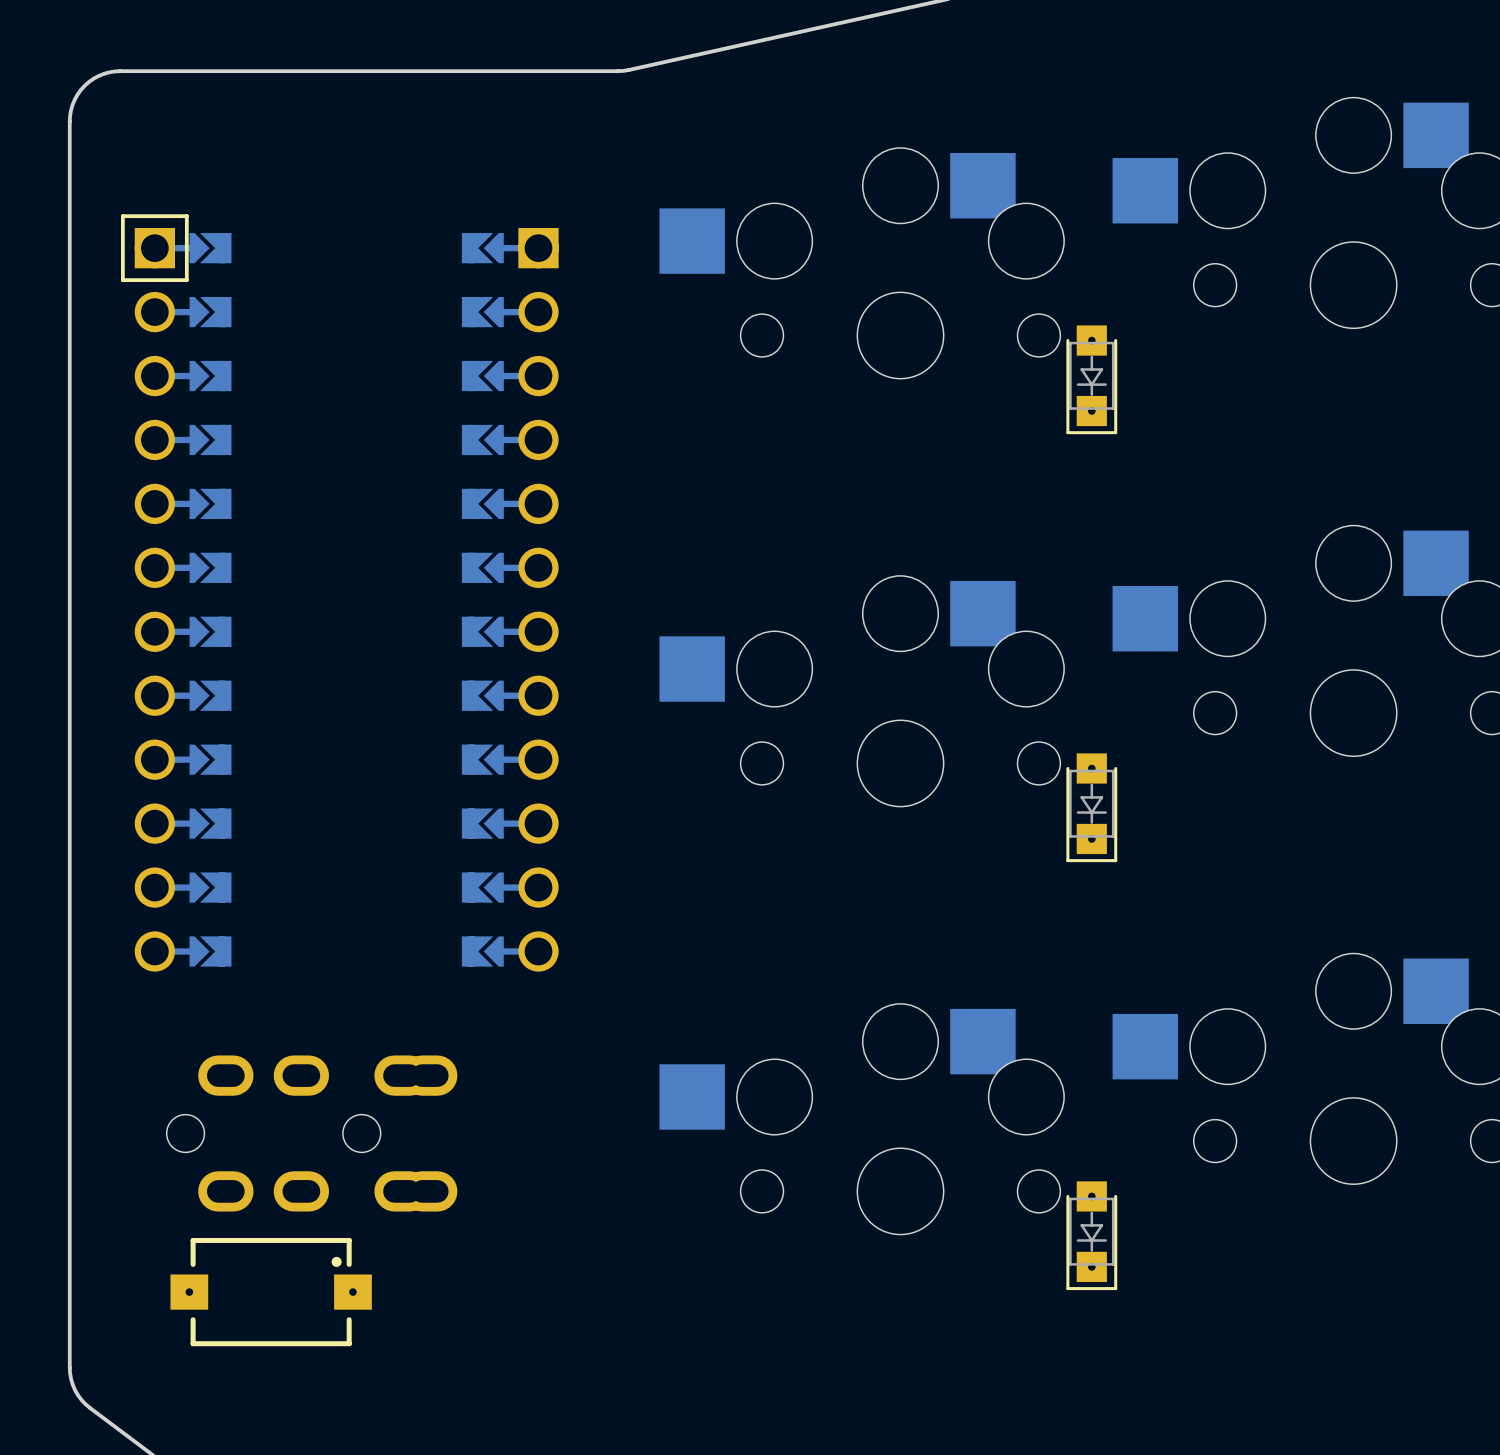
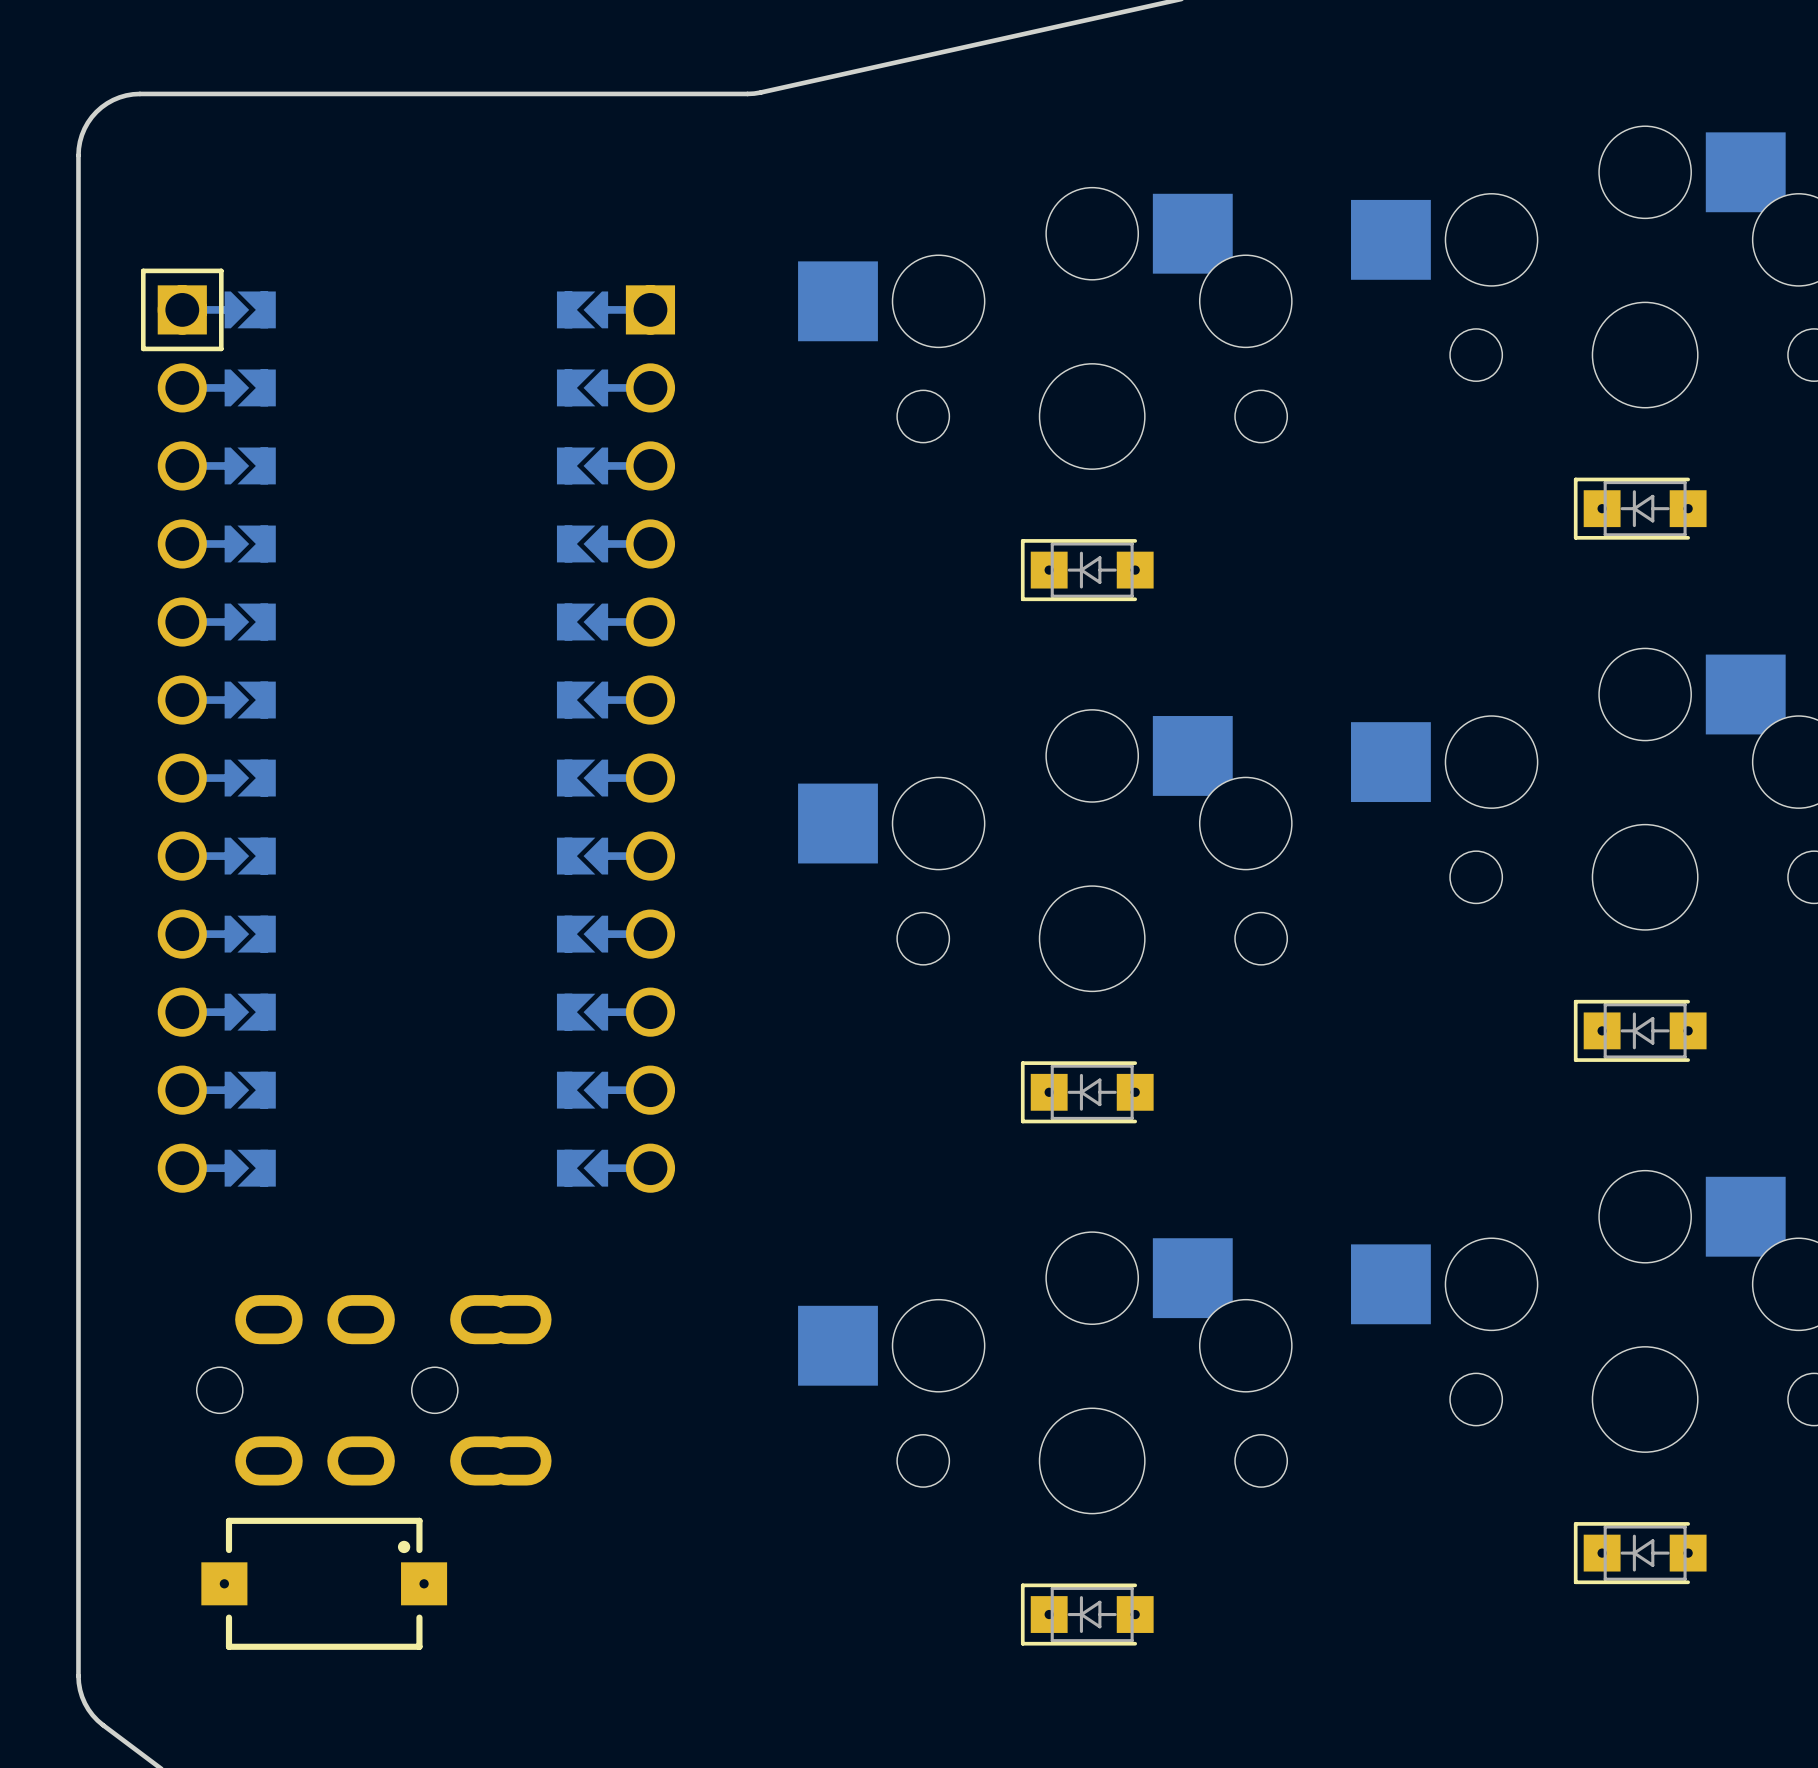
part: (1091, 379) -> none
part: none -> (1640, 508)
part: none -> (1087, 570)
part: (1091, 807) -> none
part: none -> (1640, 1030)
part: none -> (1087, 1092)
part: (1091, 1235) -> none
part: none -> (1640, 1553)
part: none -> (1087, 1614)

